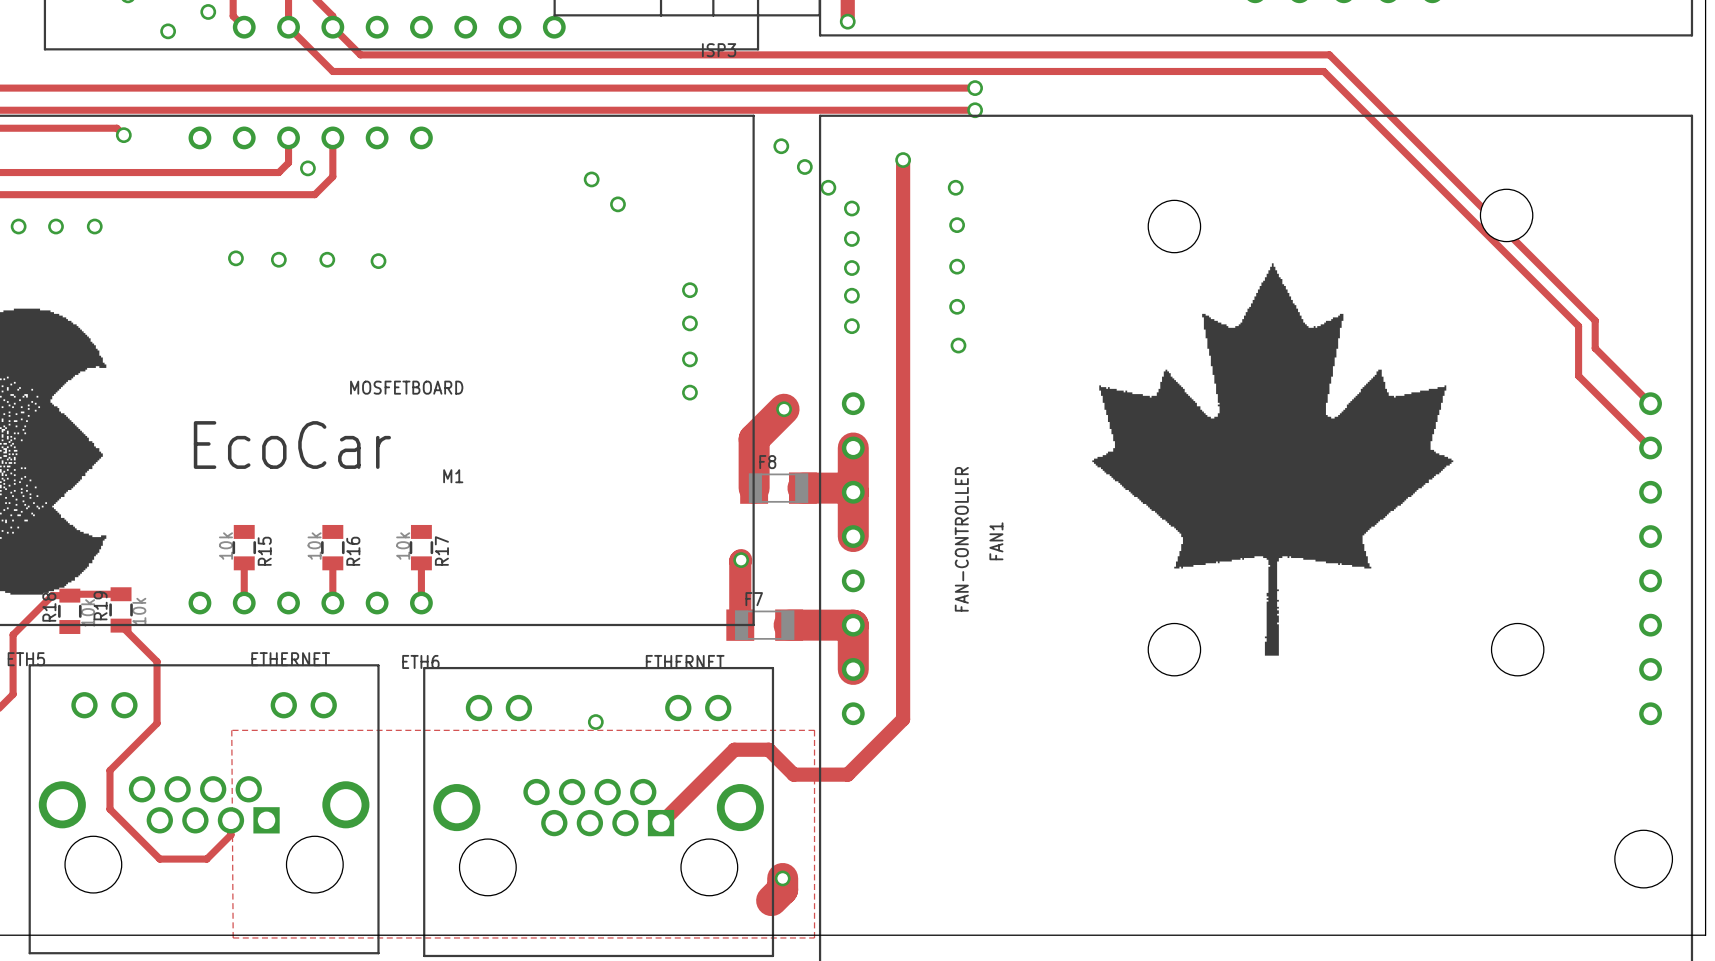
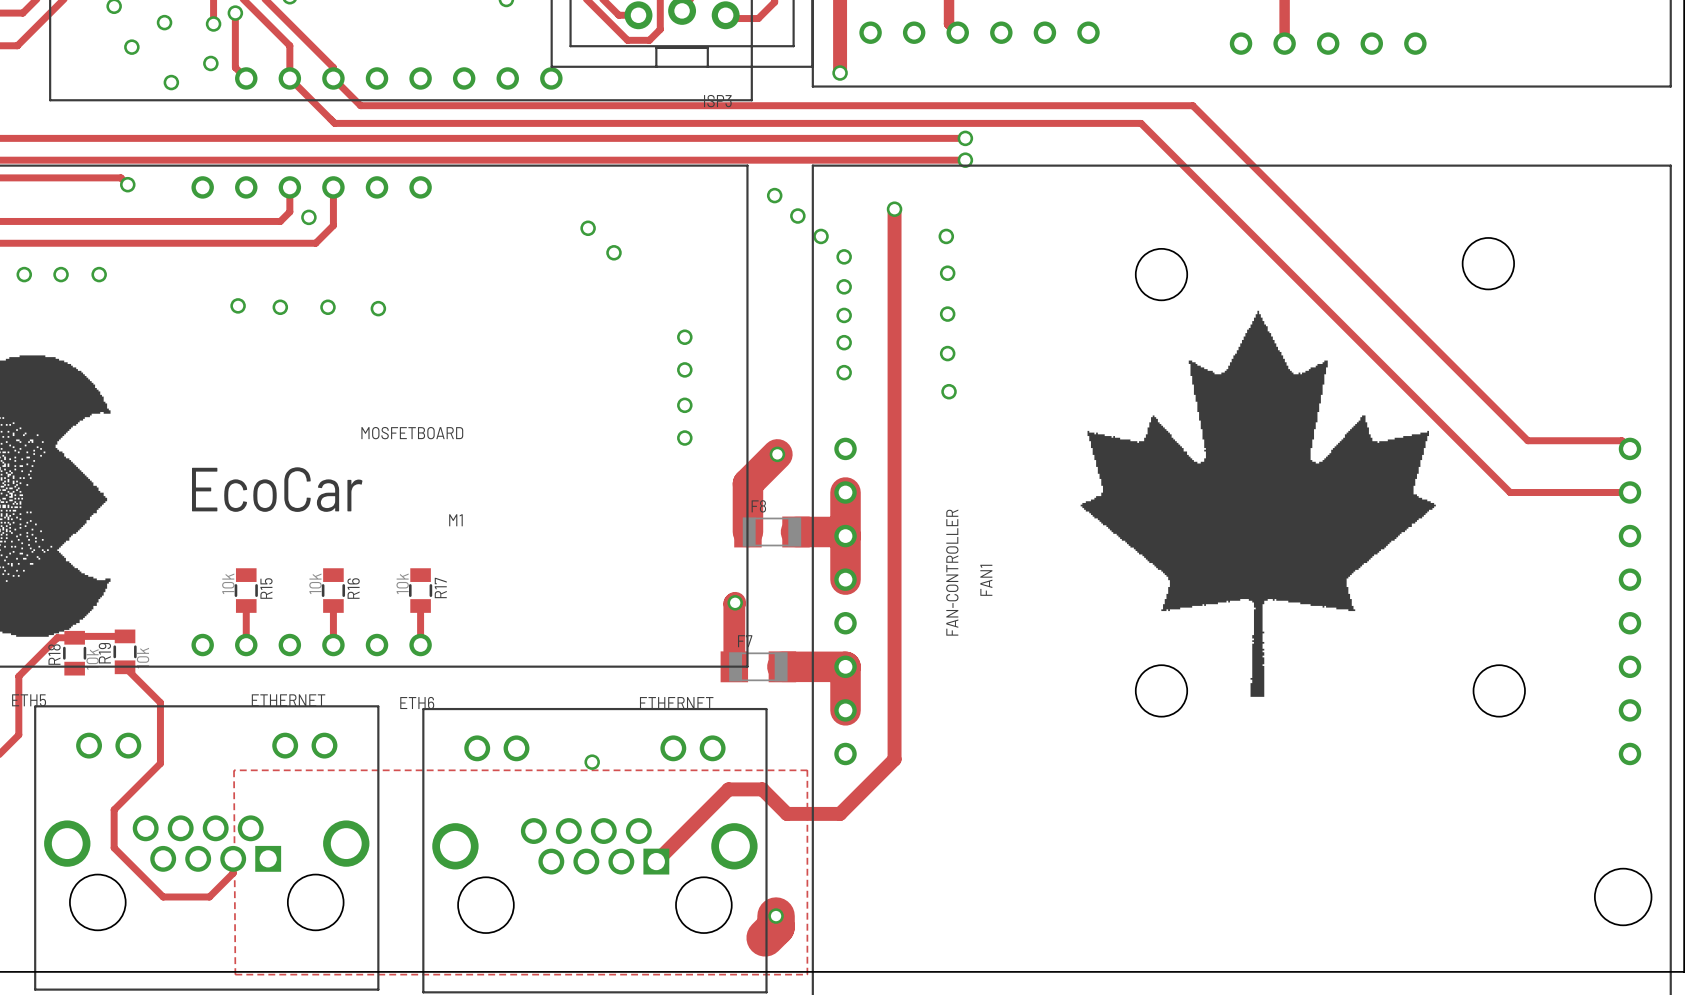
track: (1206, 54) (1329, 54) (1595, 320) (1595, 348) (1642, 395) -> (1192, 105) (1527, 440) (1621, 440)
track: (332, 71) (1323, 71) (1578, 326) (1578, 376) (1650, 447) -> (333, 122) (1141, 123) (1510, 492) (1630, 492)
track width: thin (782, 878) (782, 889) (771, 900) -> thick (776, 916) (776, 926) (765, 937)

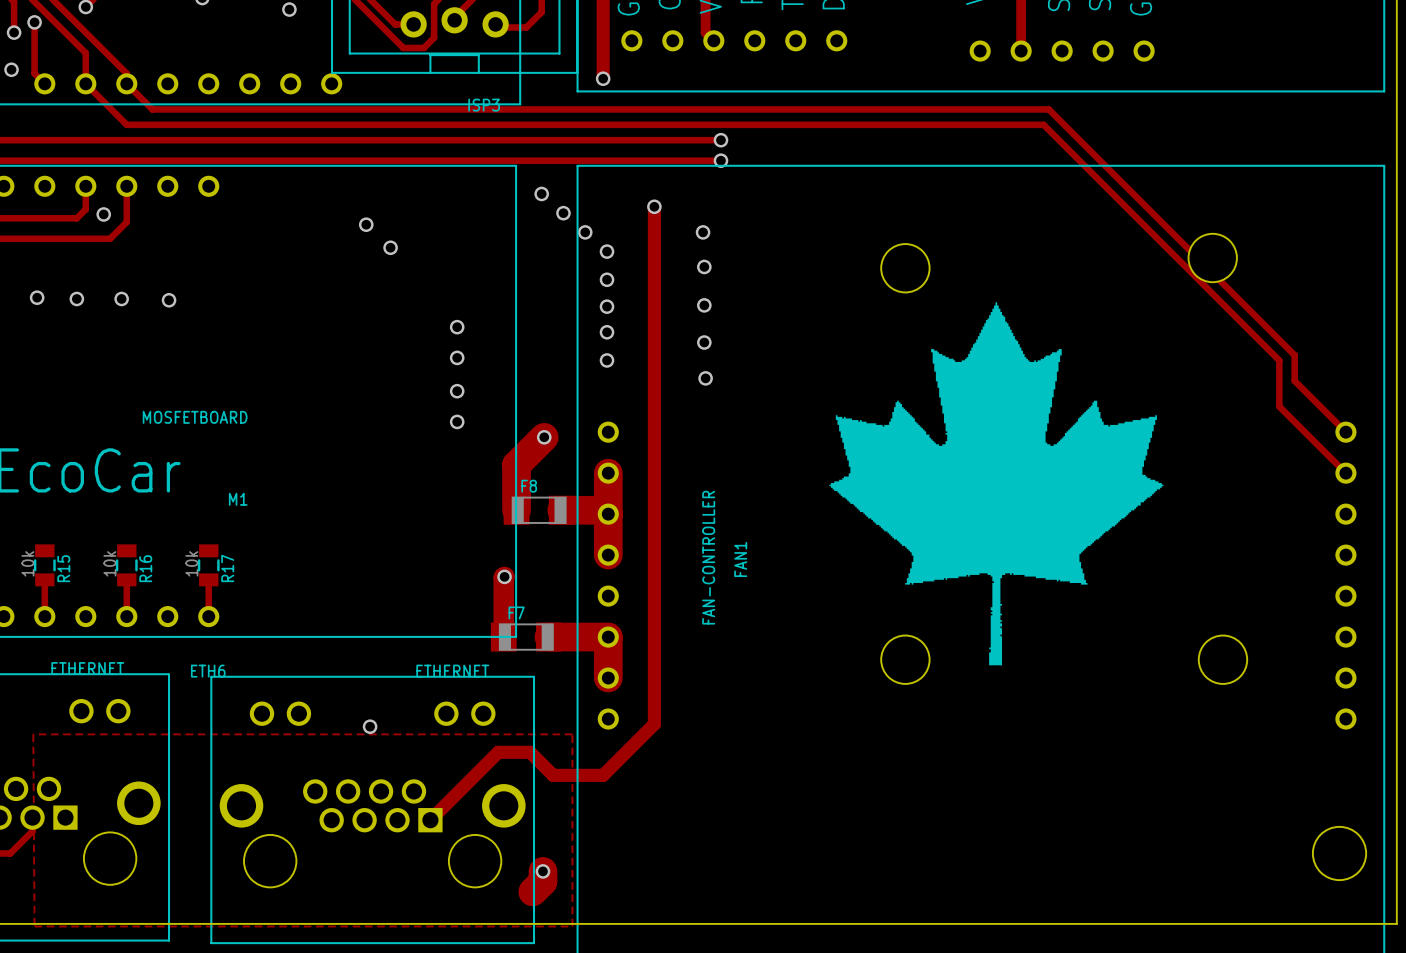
track: (1192, 105) (1527, 440) (1621, 440) -> (934, 109) (1048, 109) (1294, 355) (1294, 380) (1338, 424)
track: (333, 122) (1141, 123) (1510, 492) (1630, 492) -> (126, 124) (1043, 124) (1279, 360) (1279, 406) (1345, 473)
track width: thick (776, 916) (776, 926) (765, 937) -> thin (542, 871) (542, 881) (532, 891)

